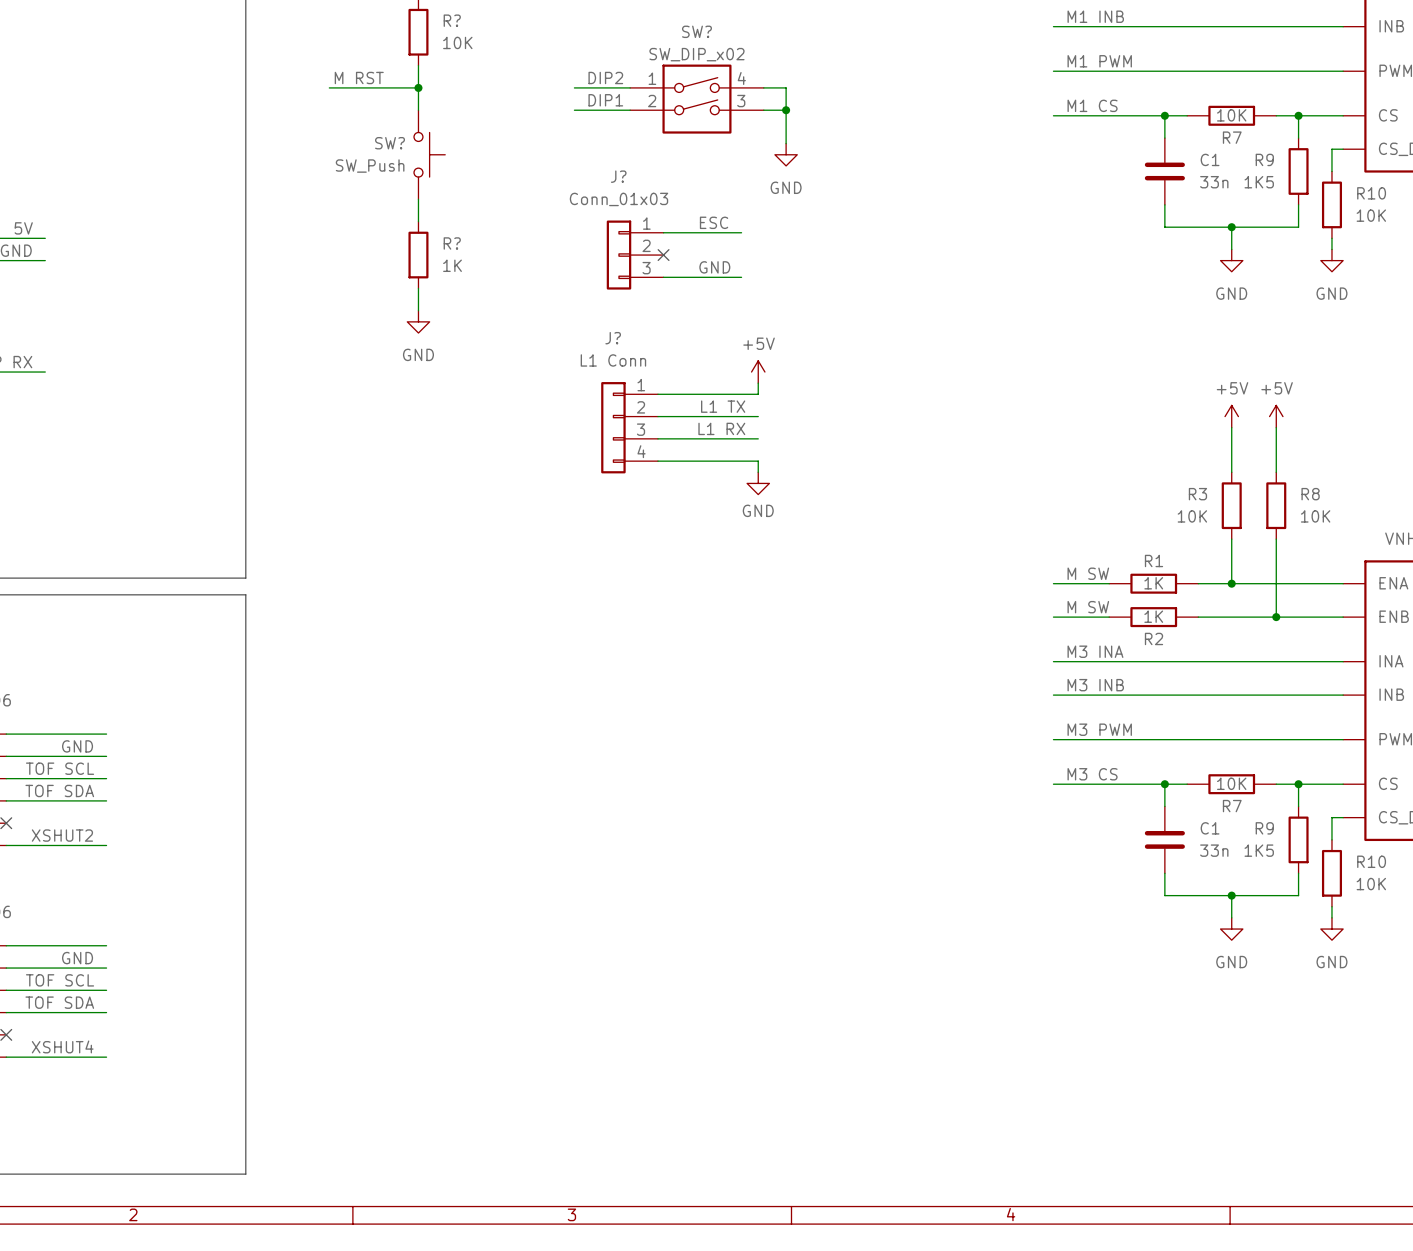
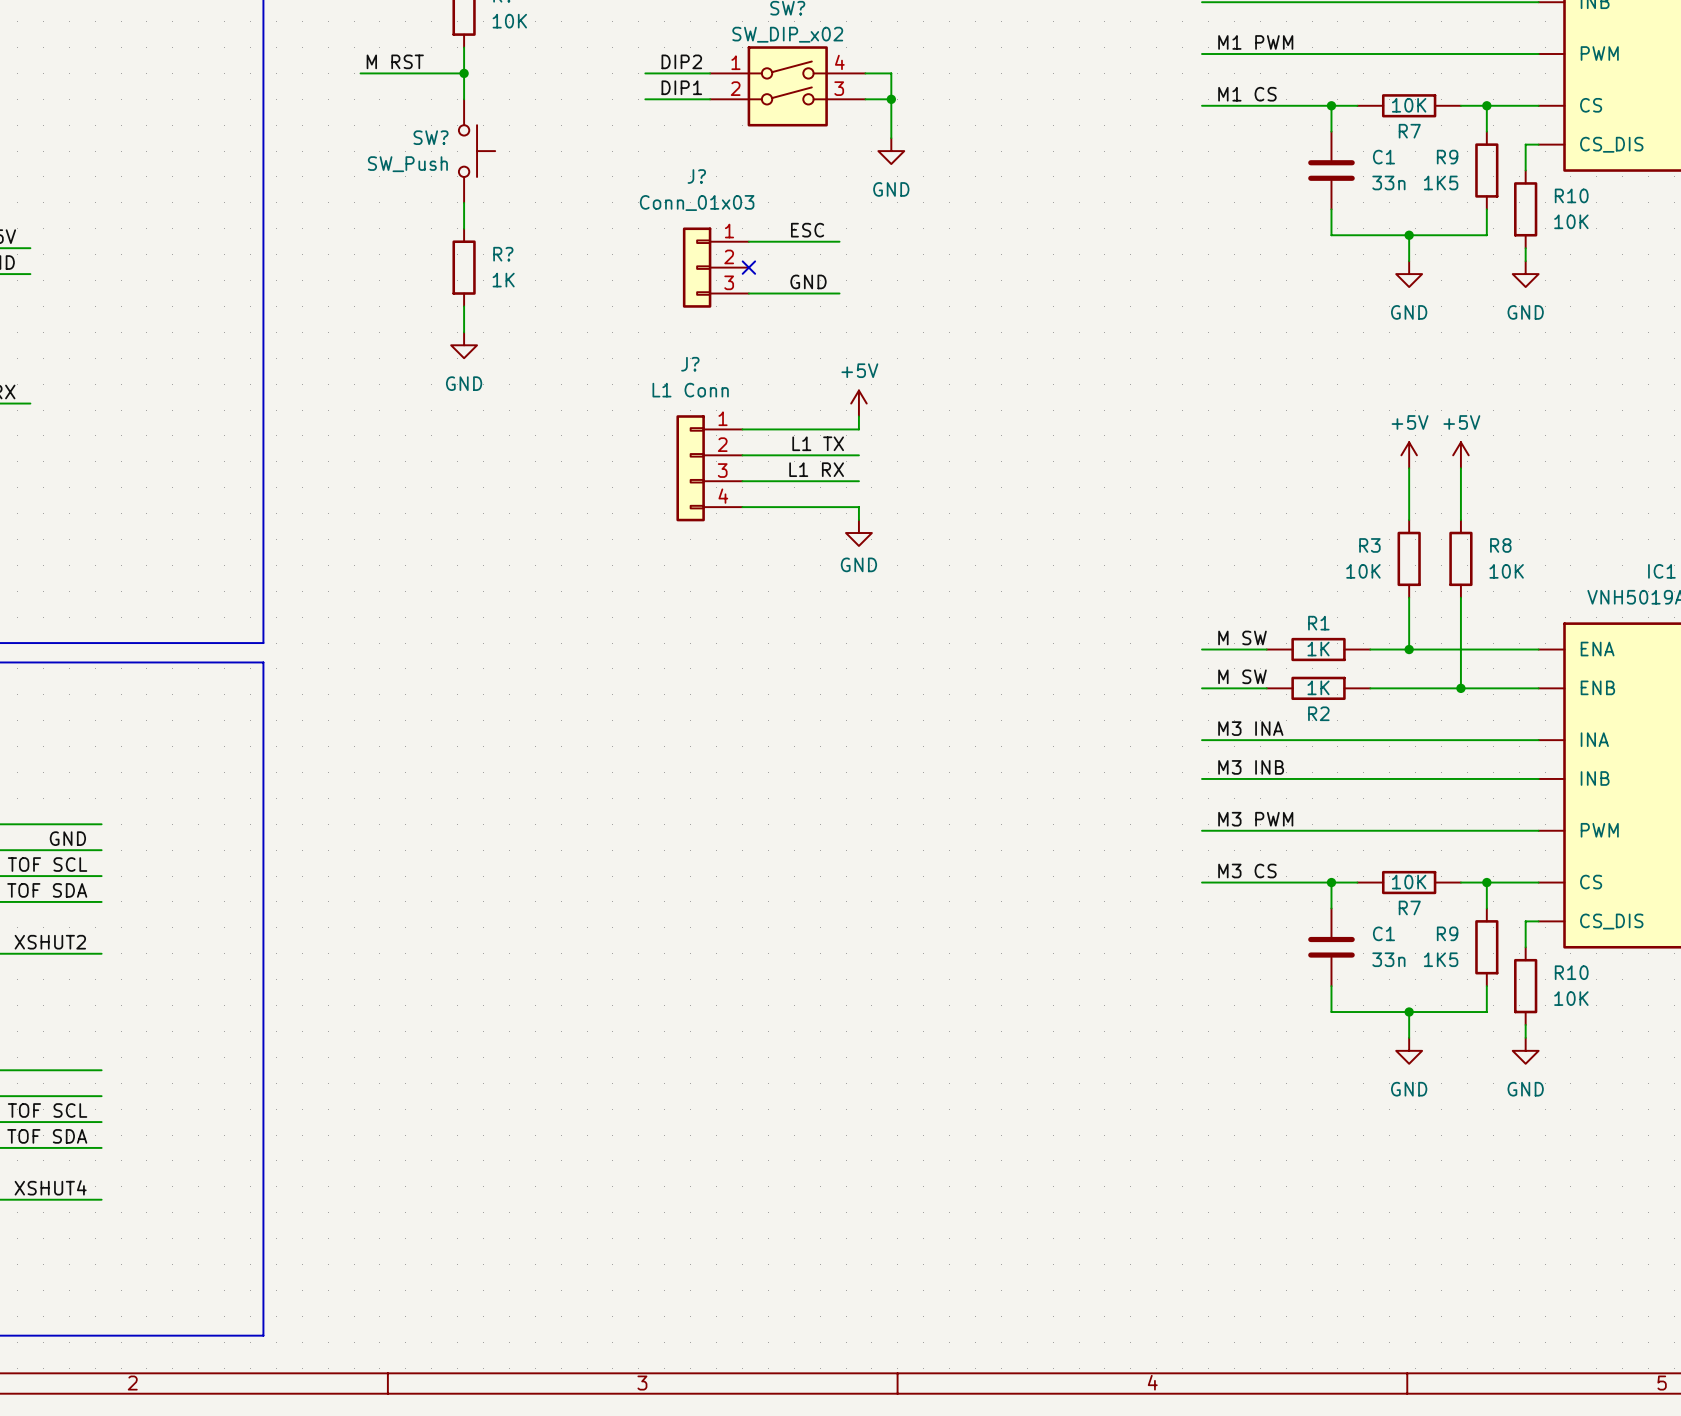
label: GND (77, 958) -> none

